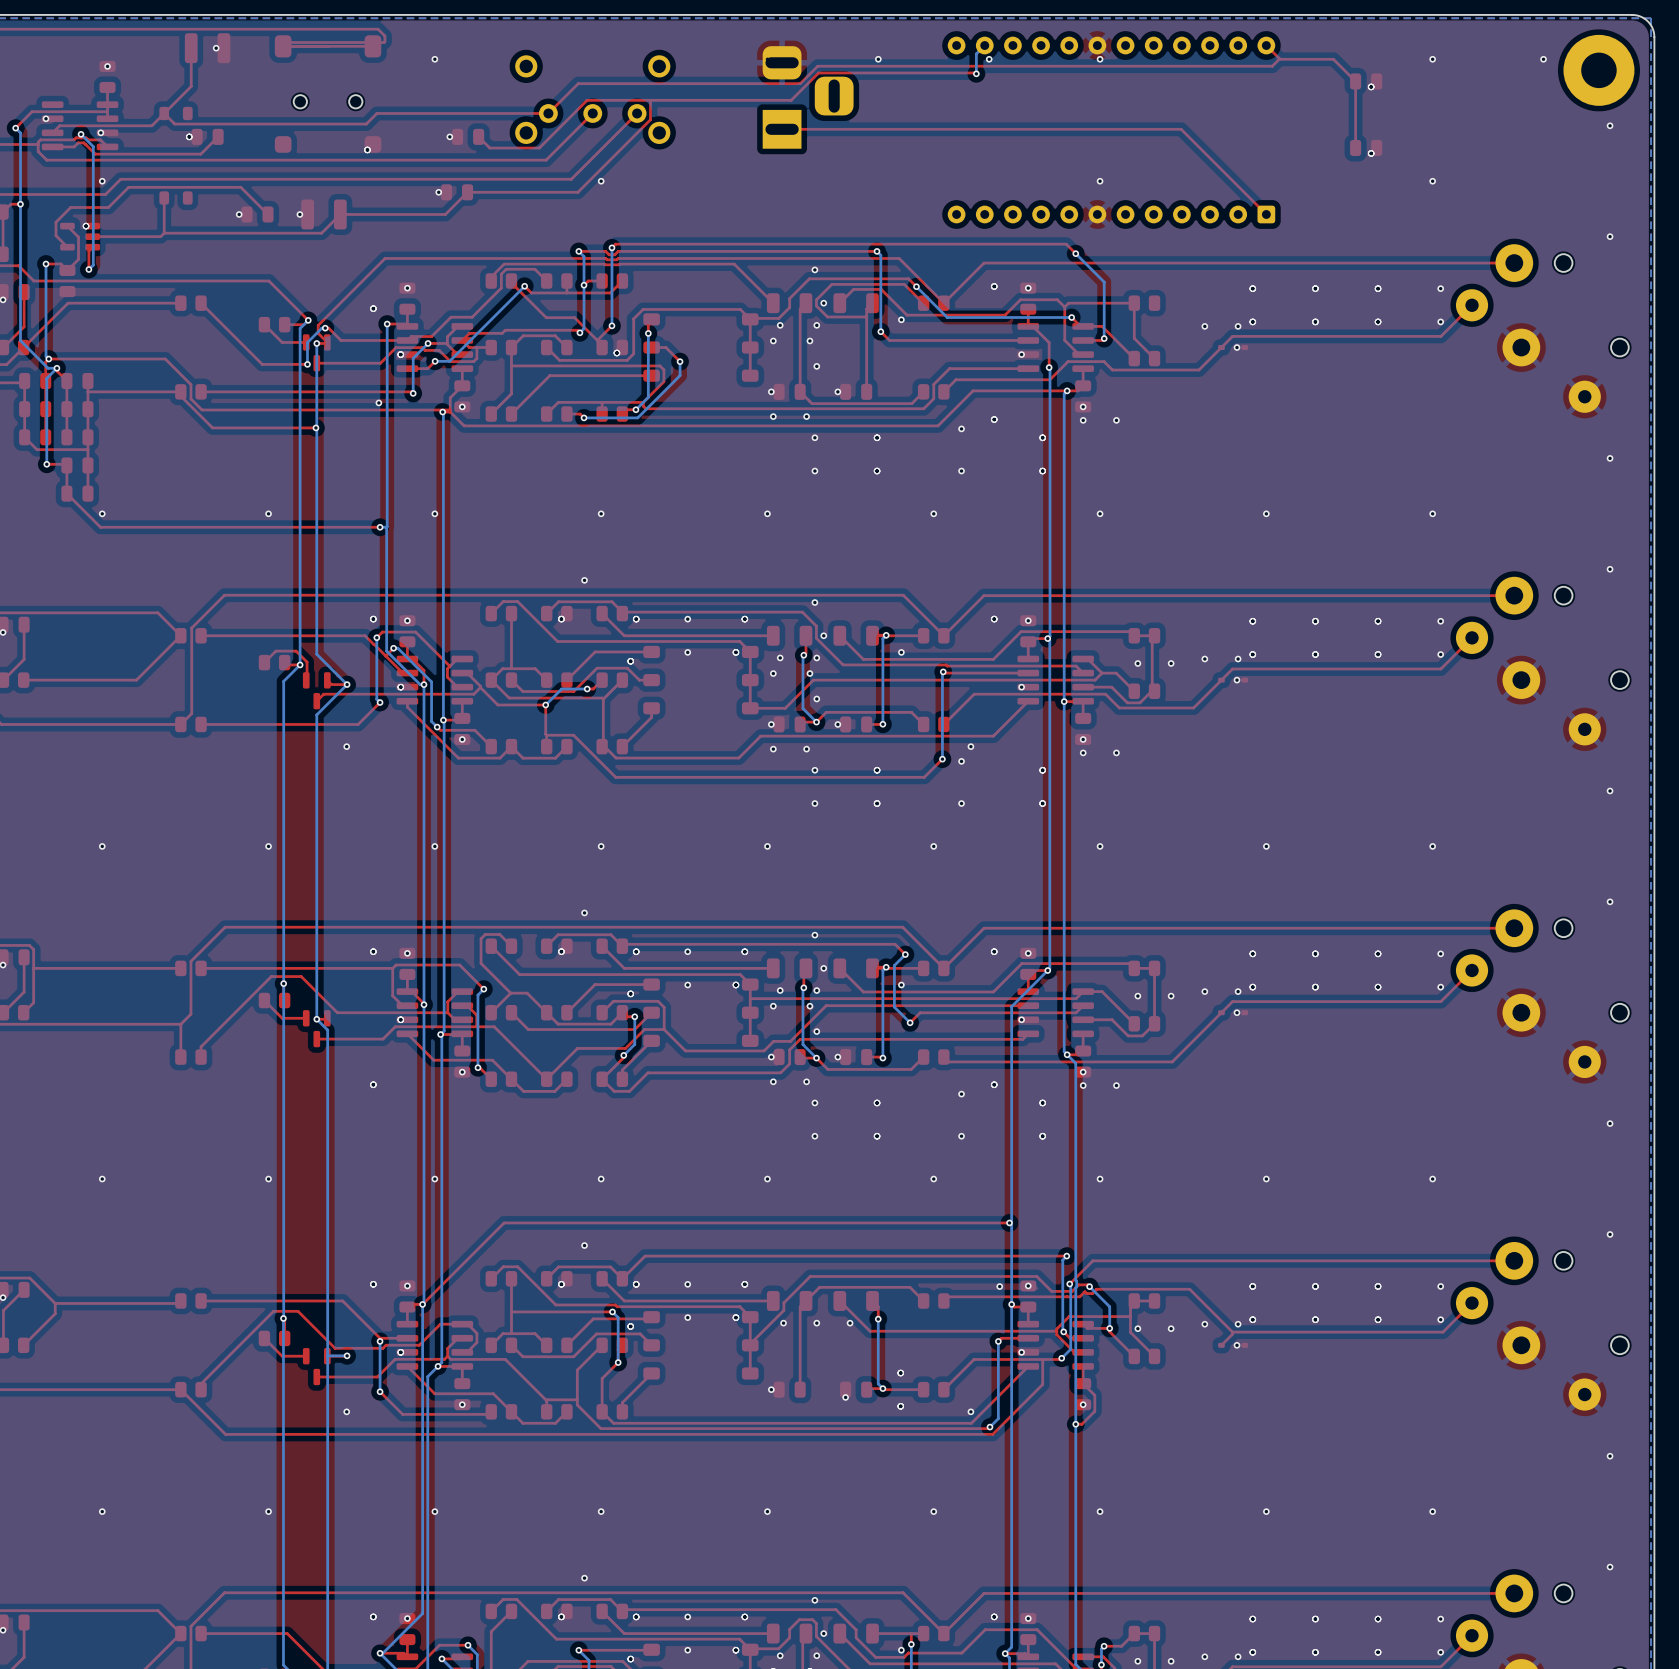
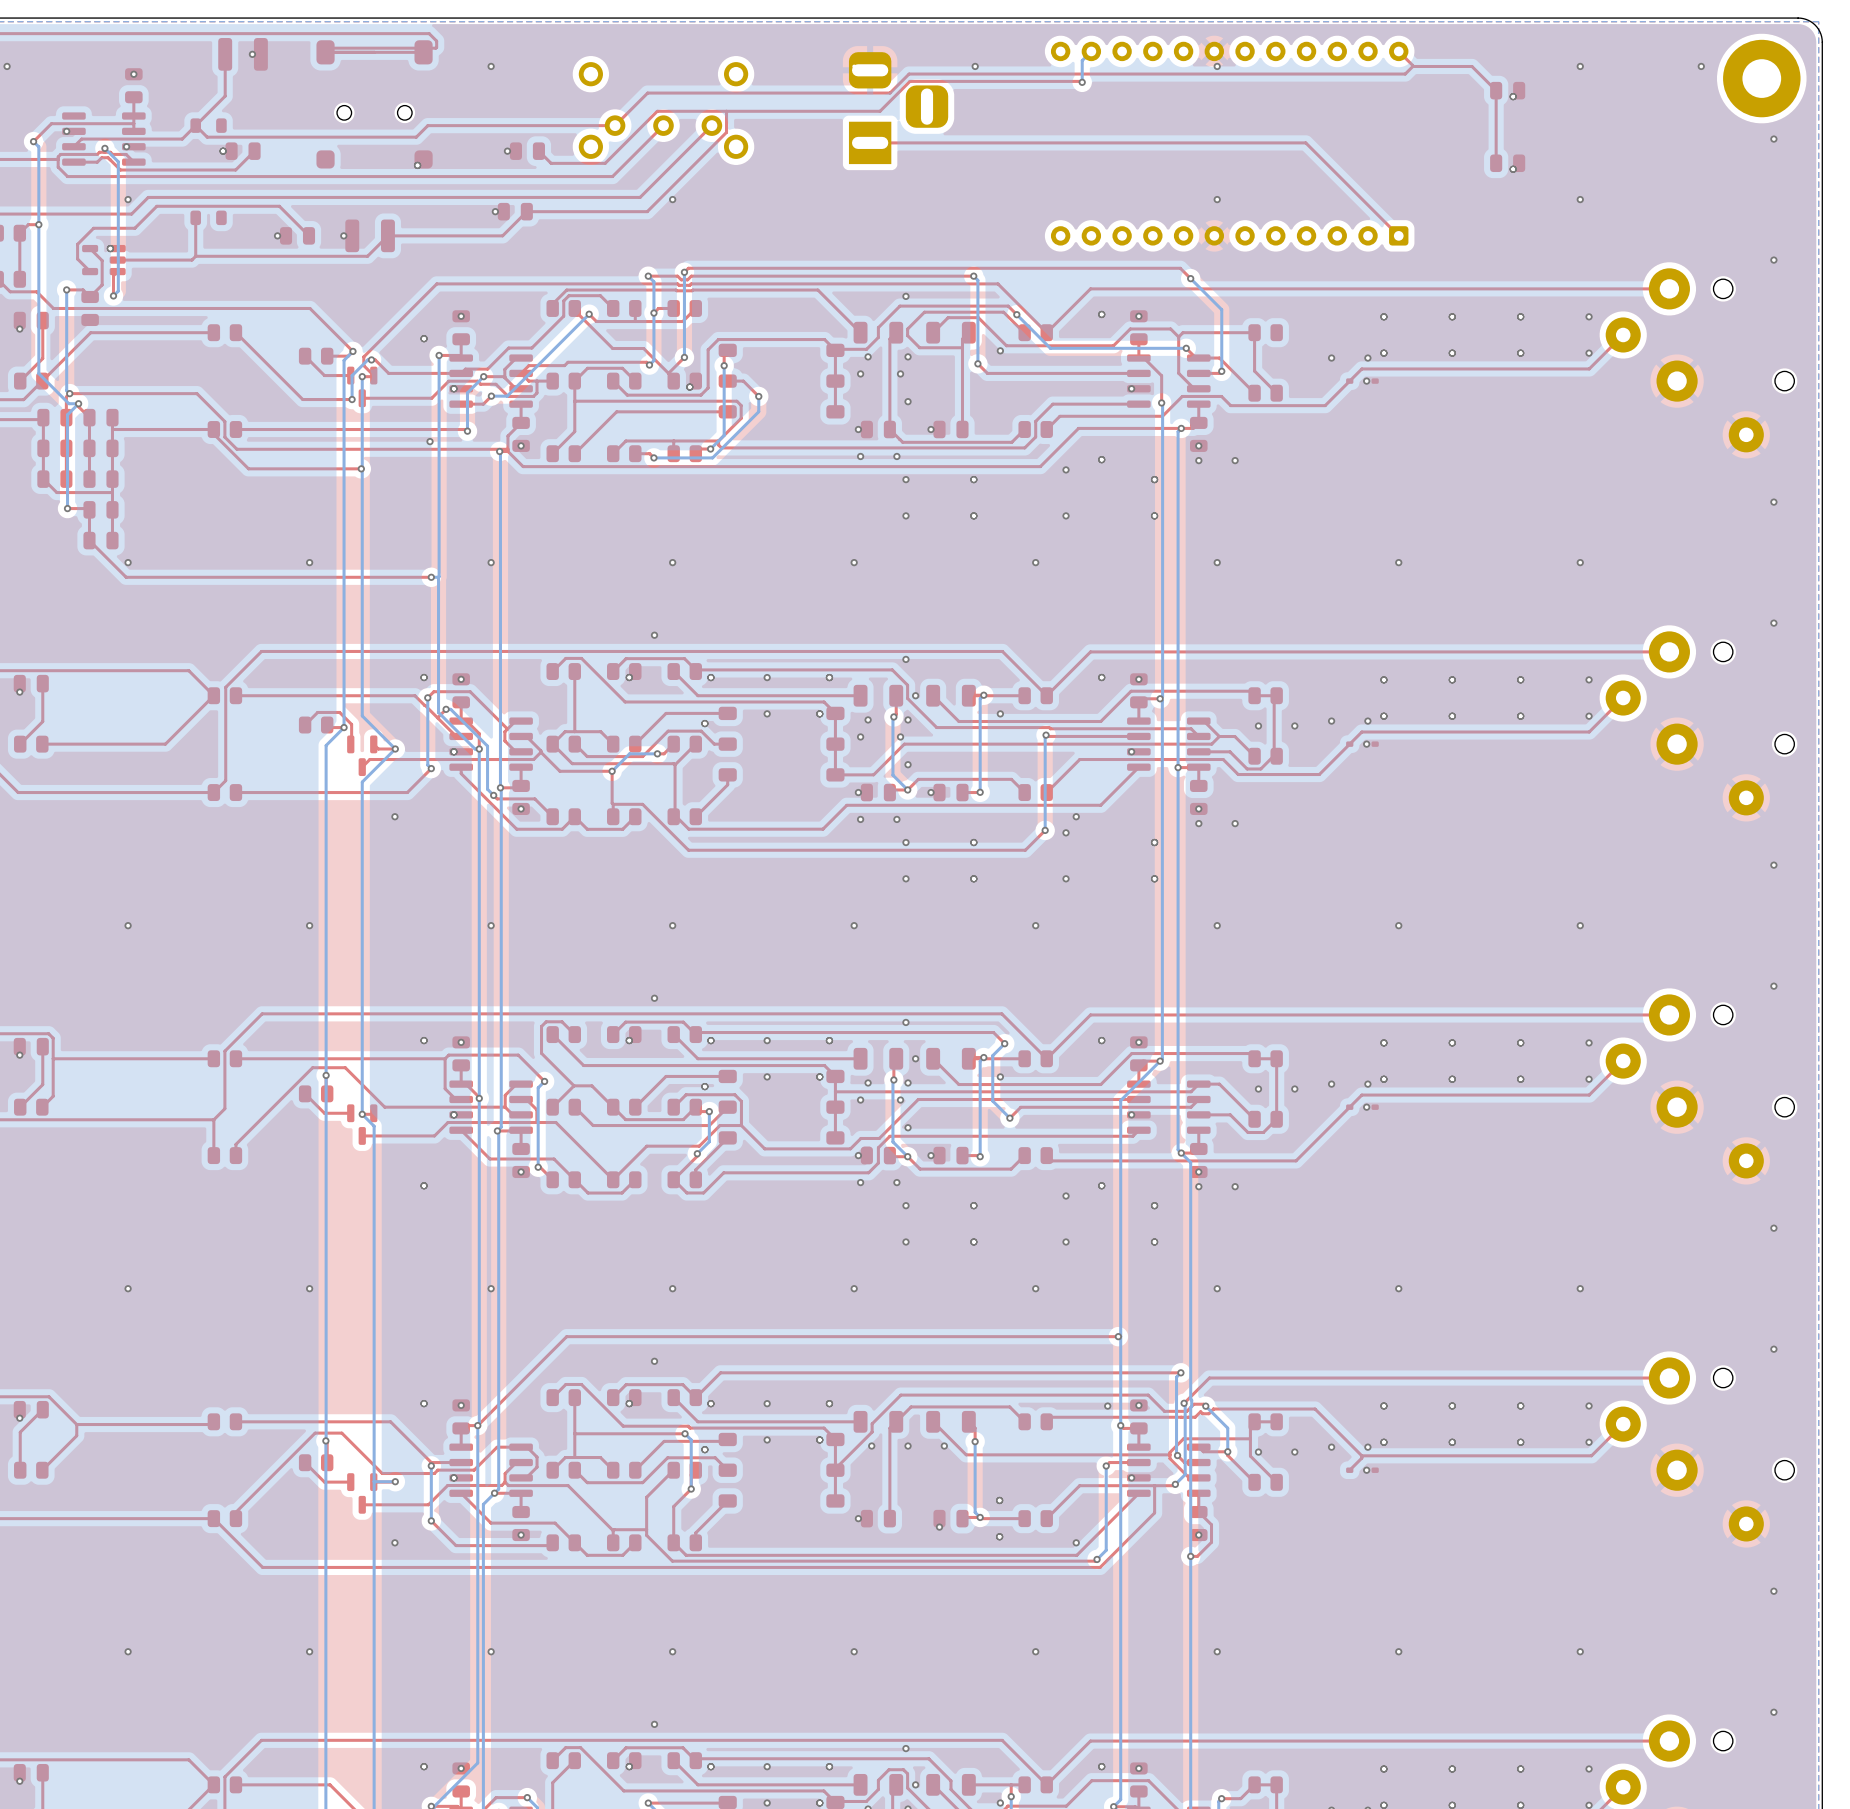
via: (989, 59) -> none
via: (823, 303) -> none

